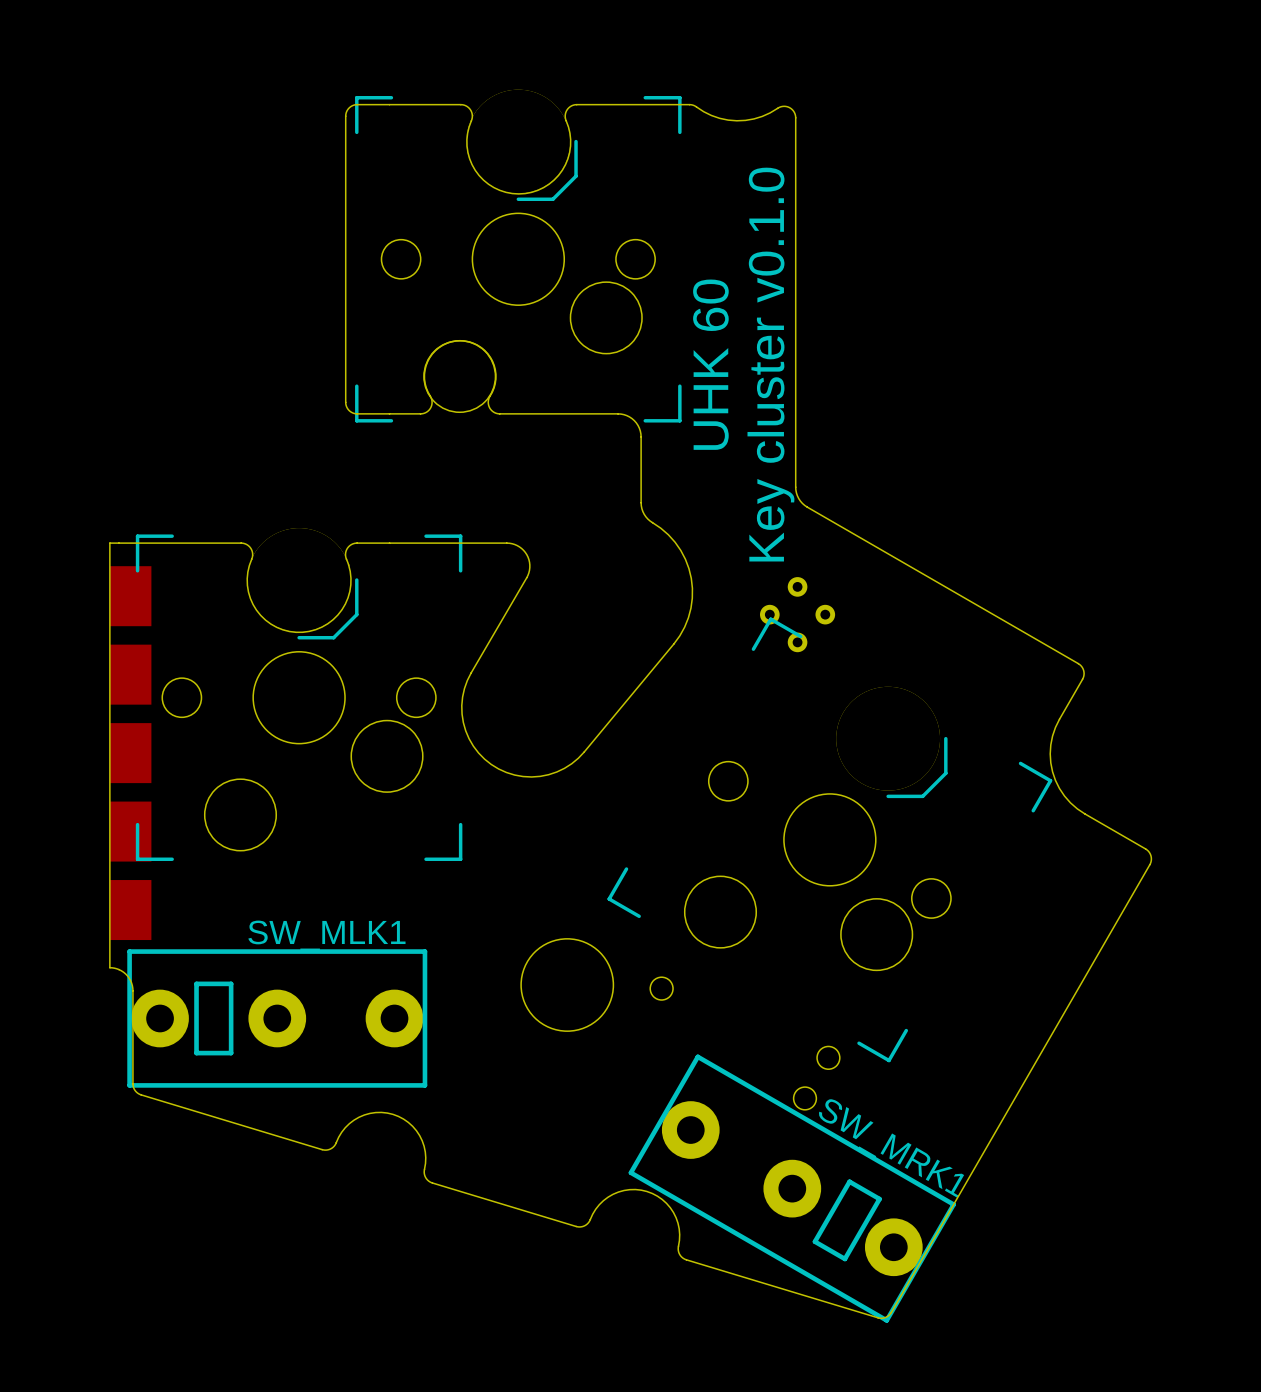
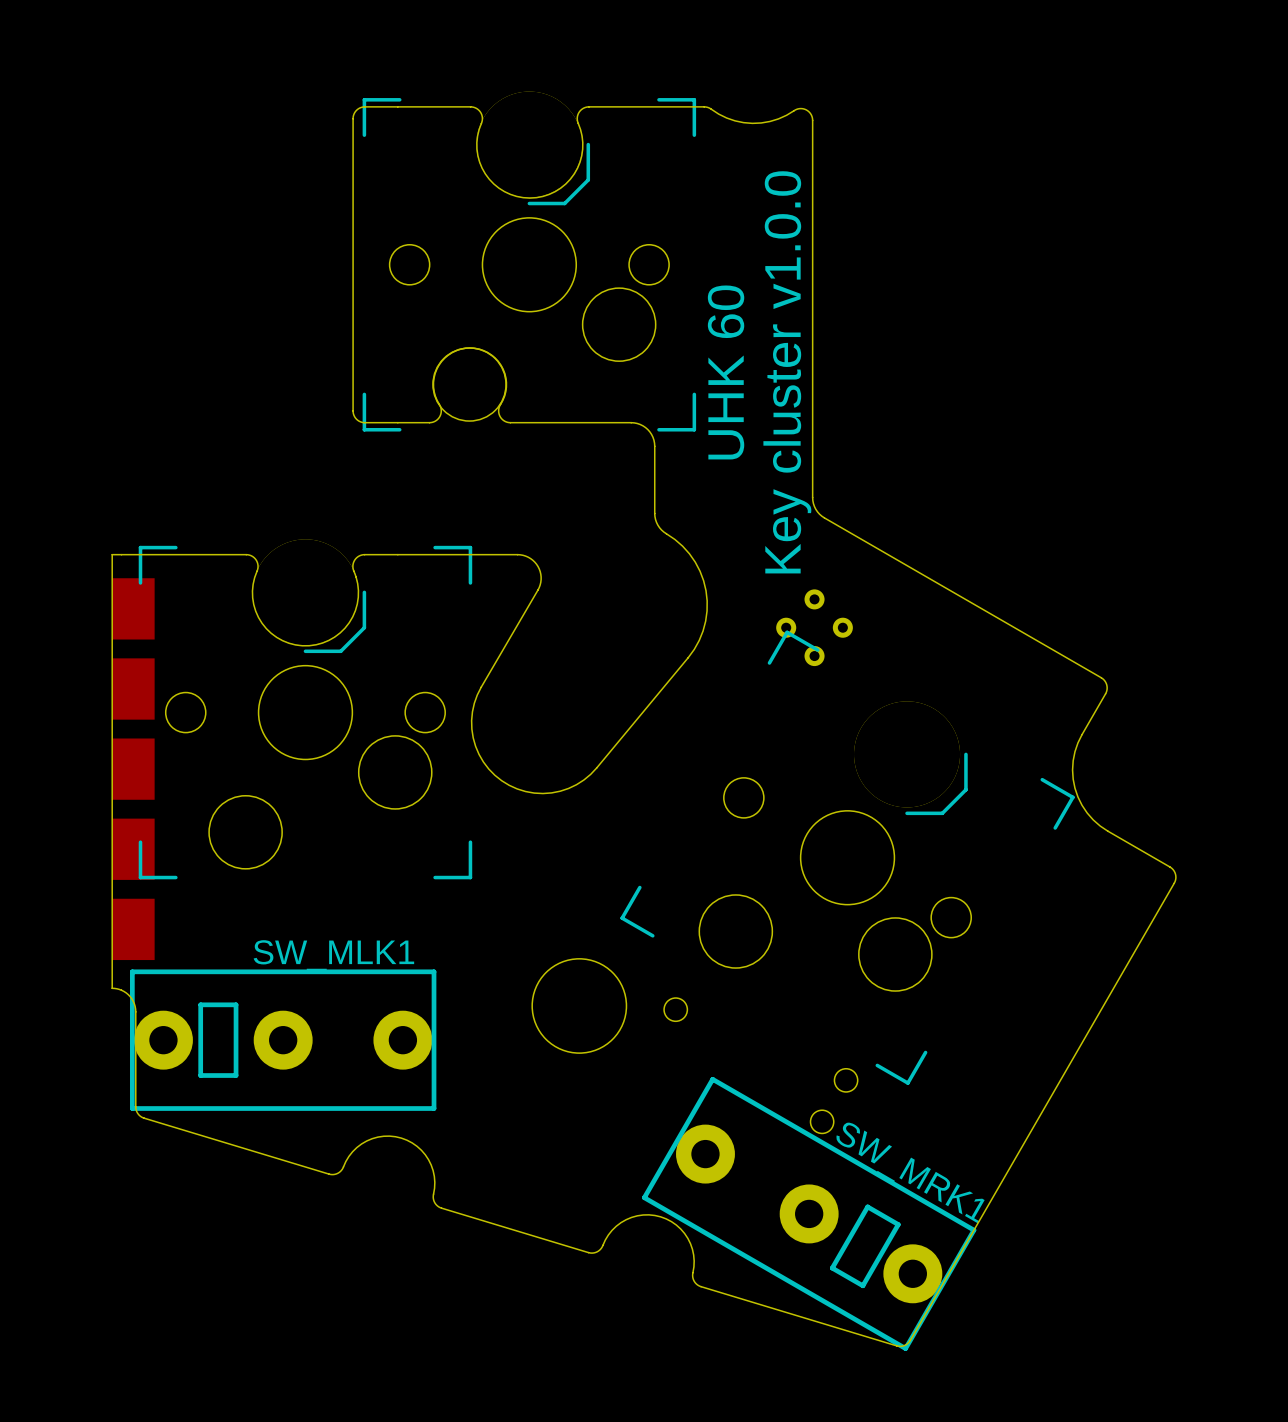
text: Key cluster v0.1.0 (770, 364) -> Key cluster v1.0.0 (787, 372)

